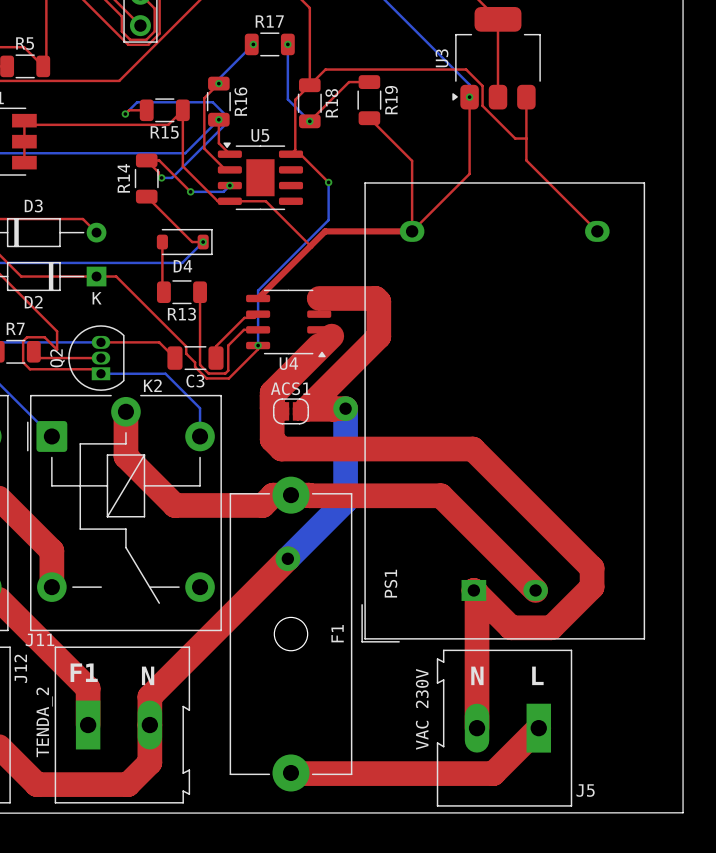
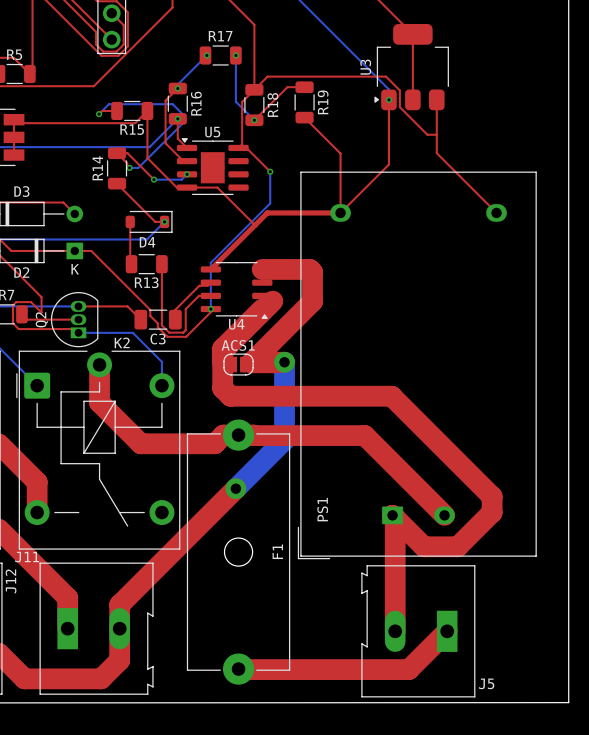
text: F1 (84, 672) -> none
text: N (148, 675) -> none
text: N (477, 675) -> none
text: L (537, 675) -> none
J5 value: VAC 230V (422, 709) -> none
J11 value: TENDA_2 (44, 722) -> none

